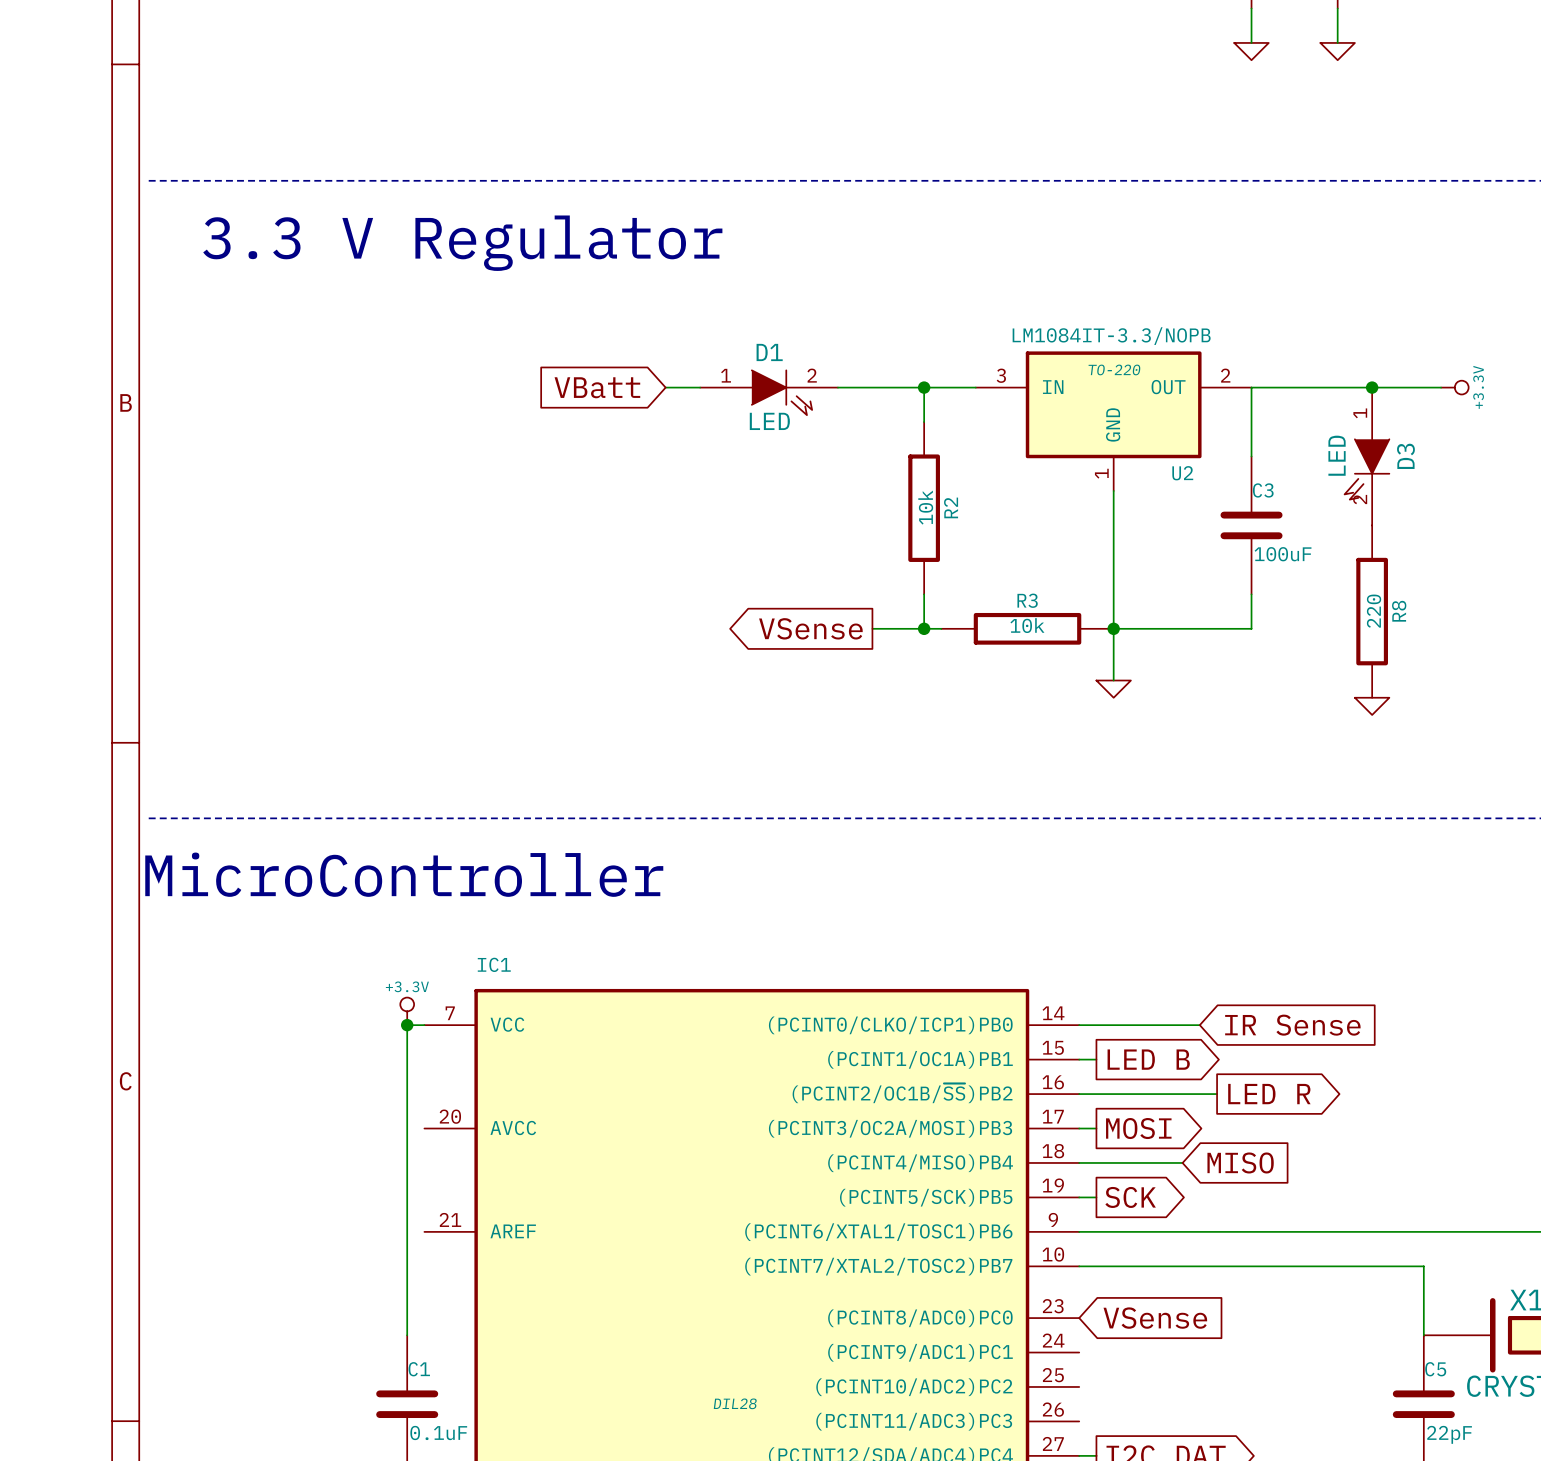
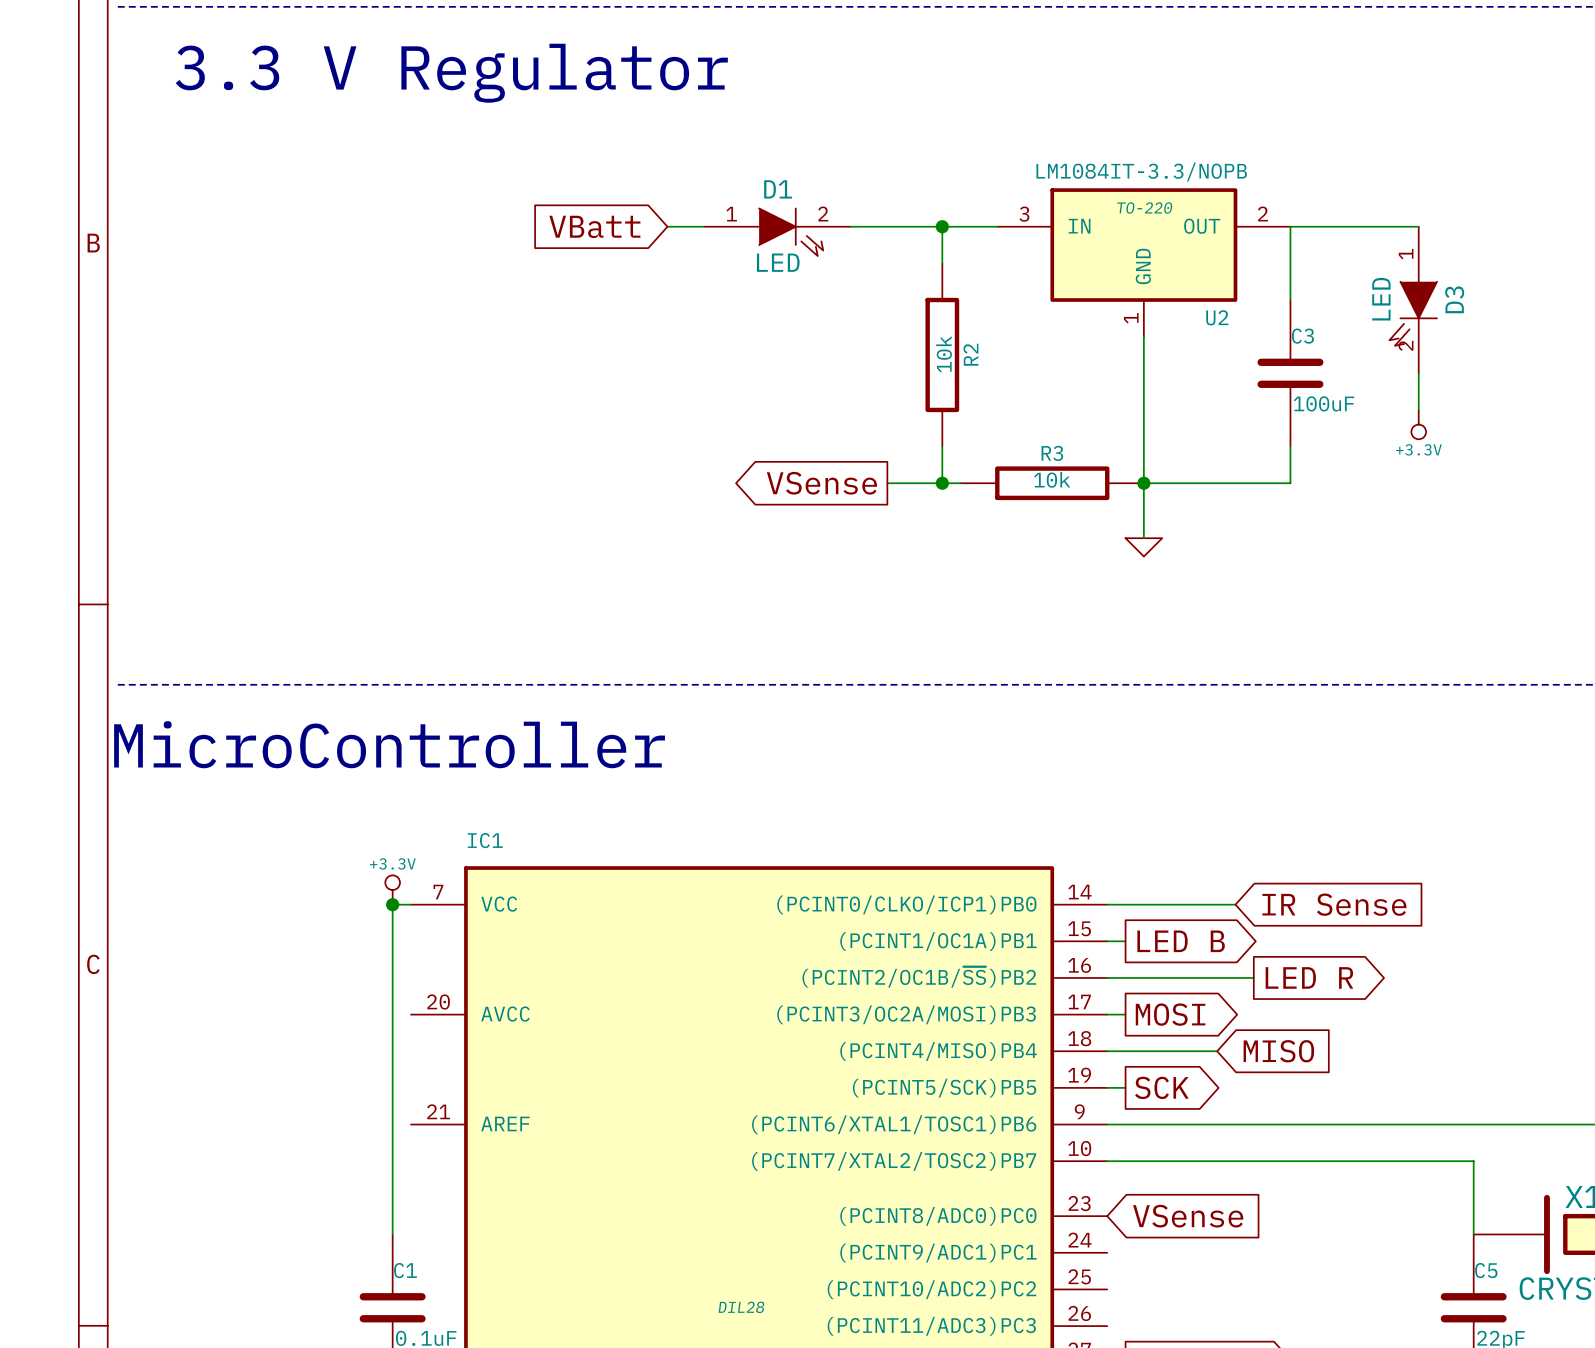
wire: (1372, 387) (1441, 387) -> none
junction: (1372, 387) -> none
power symbol rotation: 0° (1454, 387) -> 90° clockwise (1418, 424)
power symbol position: +3.3V (1454, 387) -> +3.3V (1418, 424)
R8: 220 (1372, 611) -> none
power symbol: (1372, 706) -> none

